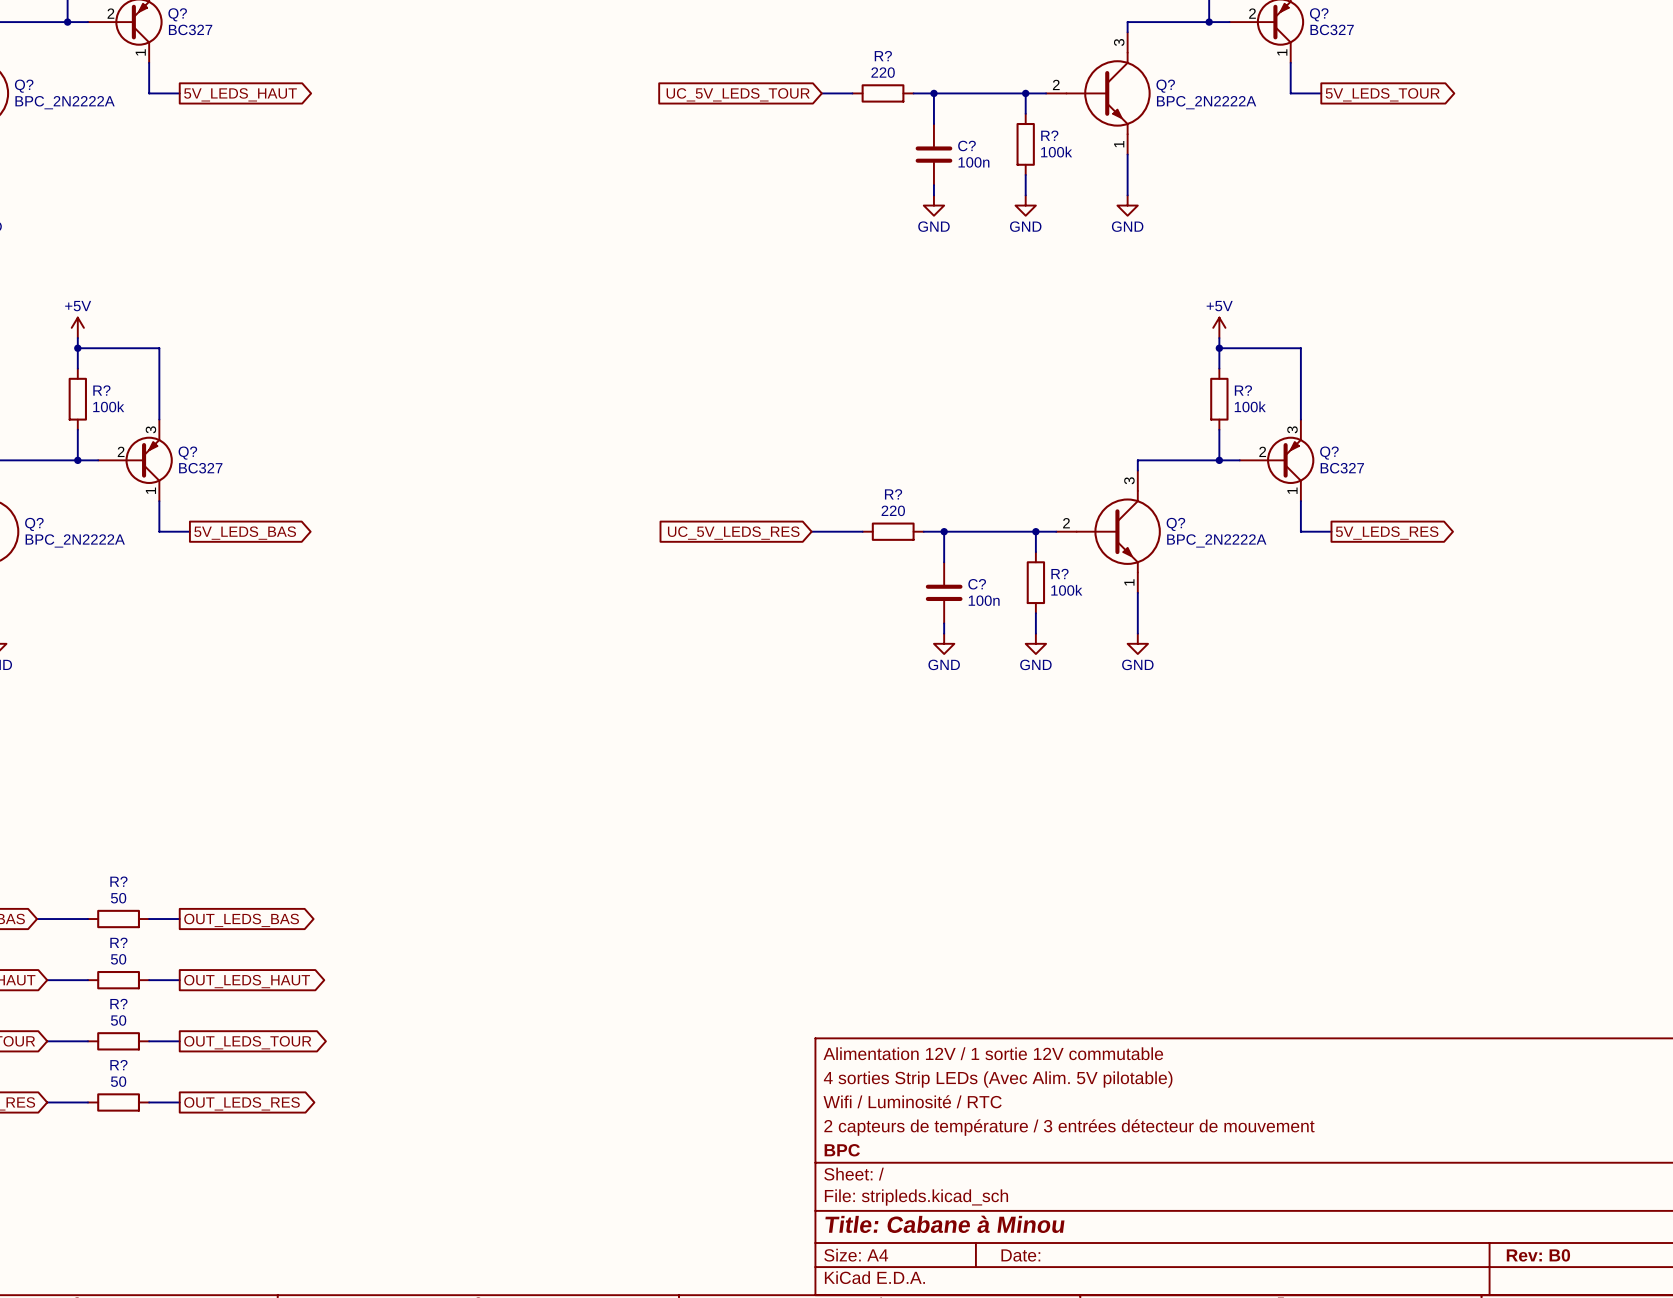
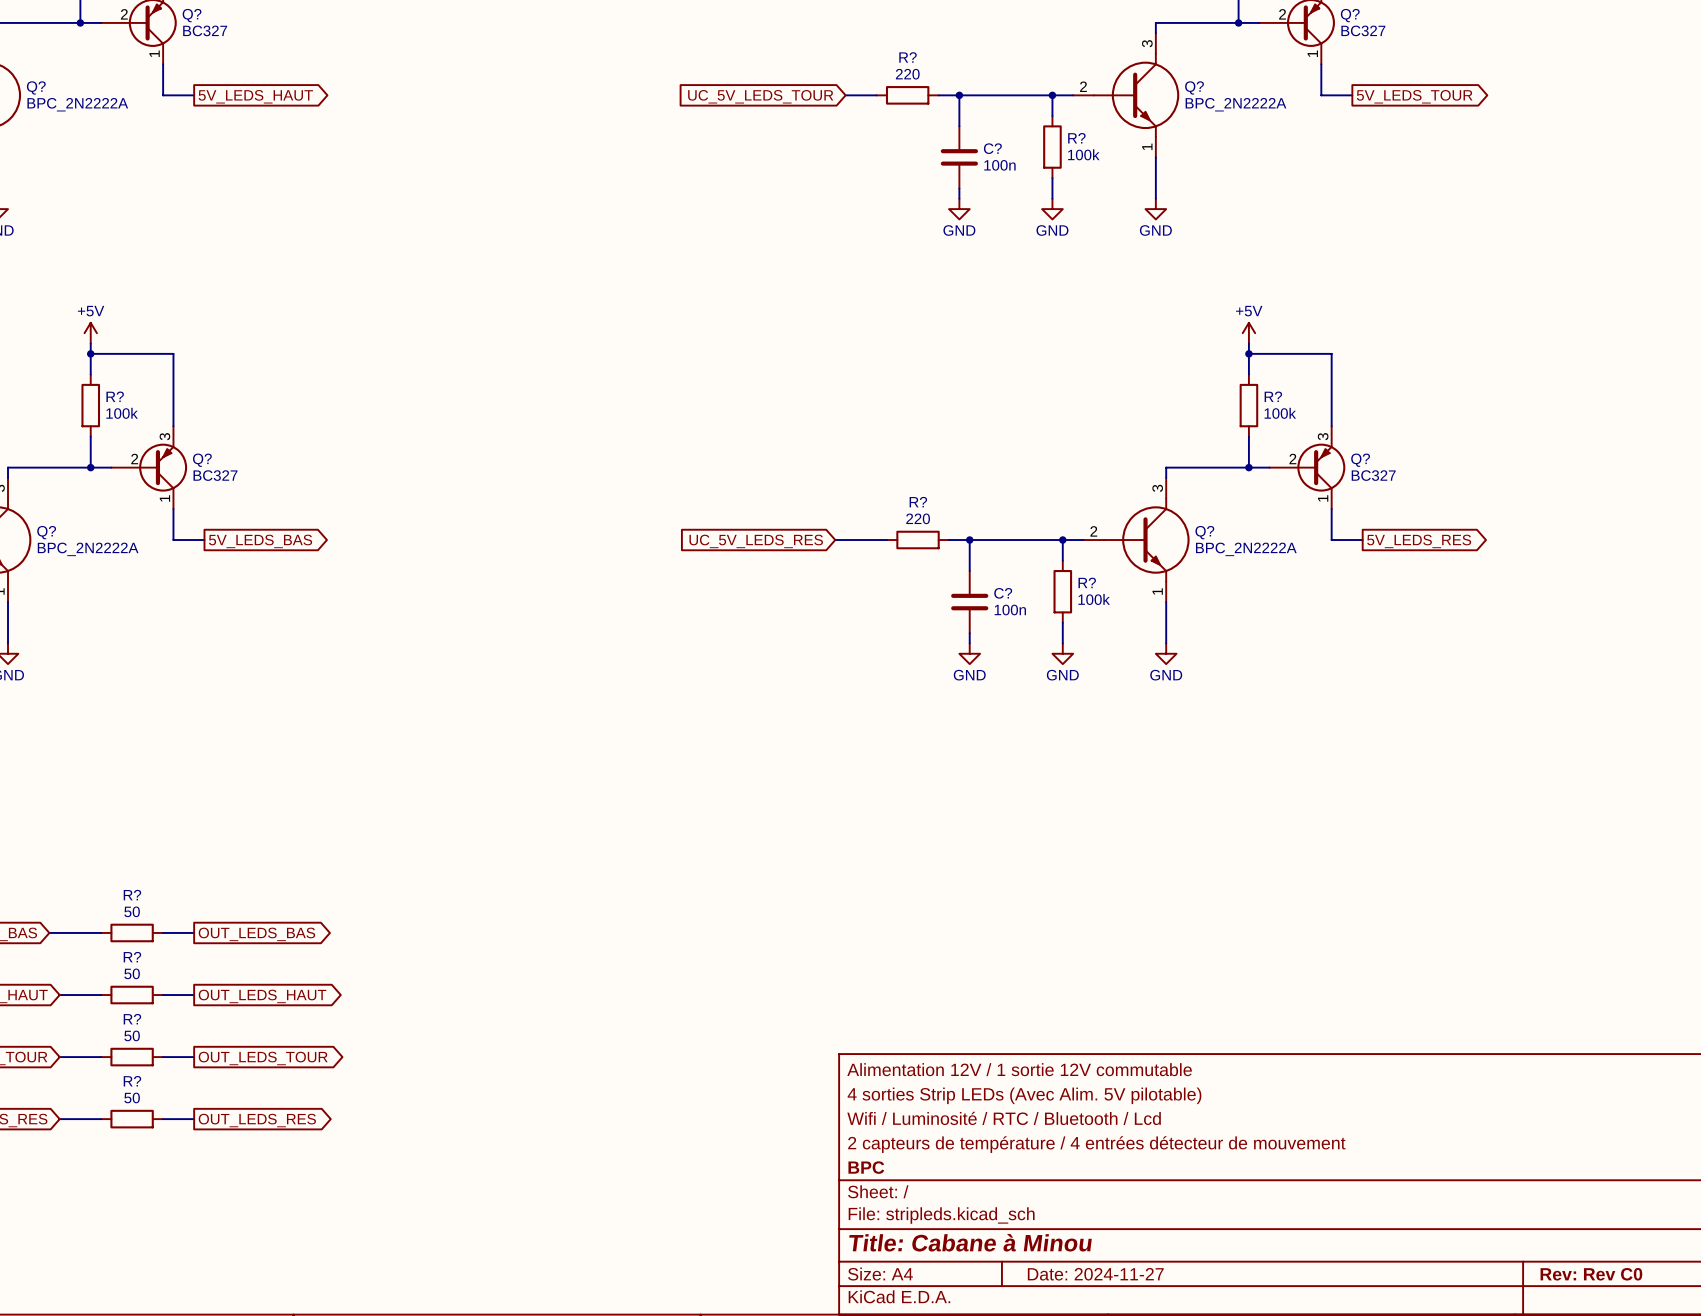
title block: Wifi / Luminosité / RTC (912, 1101) -> Wifi / Luminosité / RTC / Bluetooth / Lcd (1004, 1118)
title block: 2 capteurs de température / 3 entrées détecteur de mouvement (1069, 1127) -> 2 capteurs de température / 4 entrées détecteur de mouvement (1096, 1144)
title block: Date: (1020, 1255) -> Date: 2024-11-27 (1095, 1274)
title block: Rev: B0 (1538, 1255) -> Rev: Rev C0 (1591, 1274)

